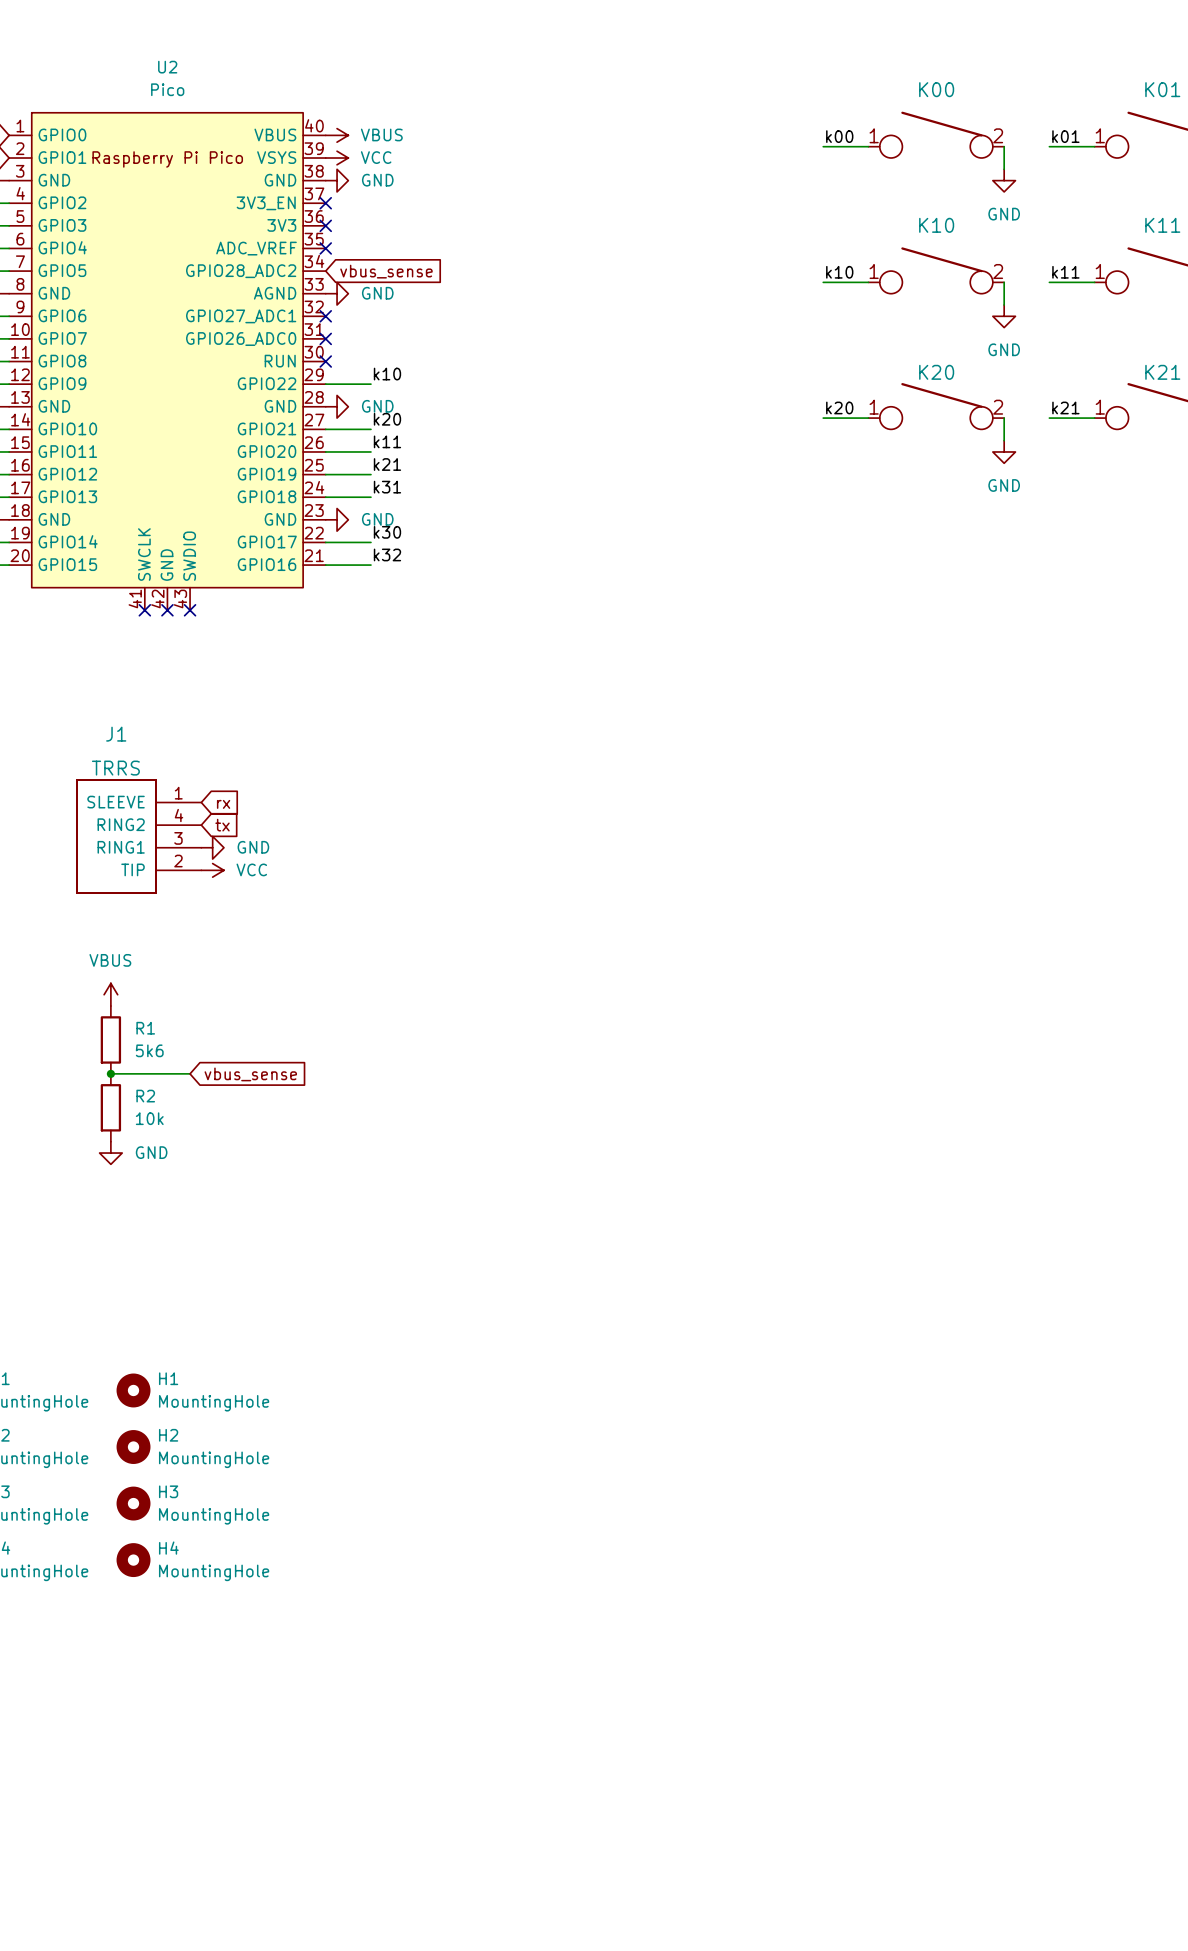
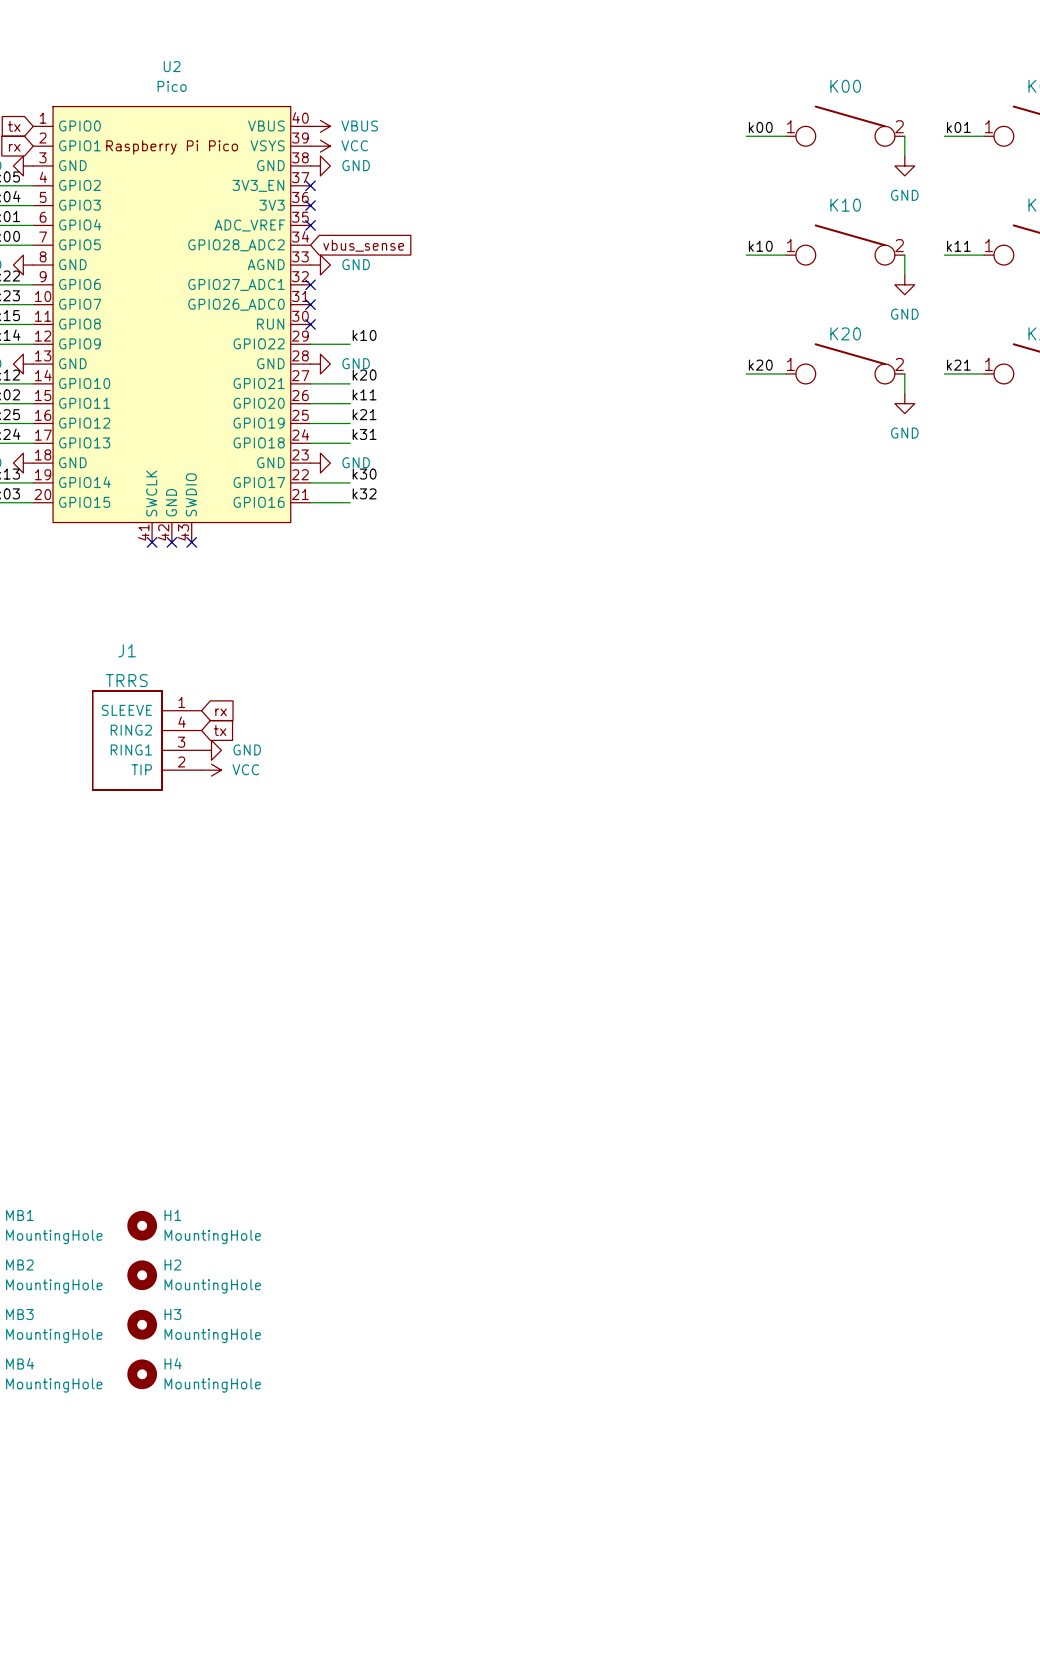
power symbol: VBUS (110, 994) -> none
R1: 5k6 (110, 1039) -> none
wire: (110, 1073) (190, 1073) -> none
junction: (110, 1073) -> none
global label: vbus_sense (250, 1074) -> none
R2: 10k (110, 1107) -> none
power symbol: GND (110, 1153) -> none

